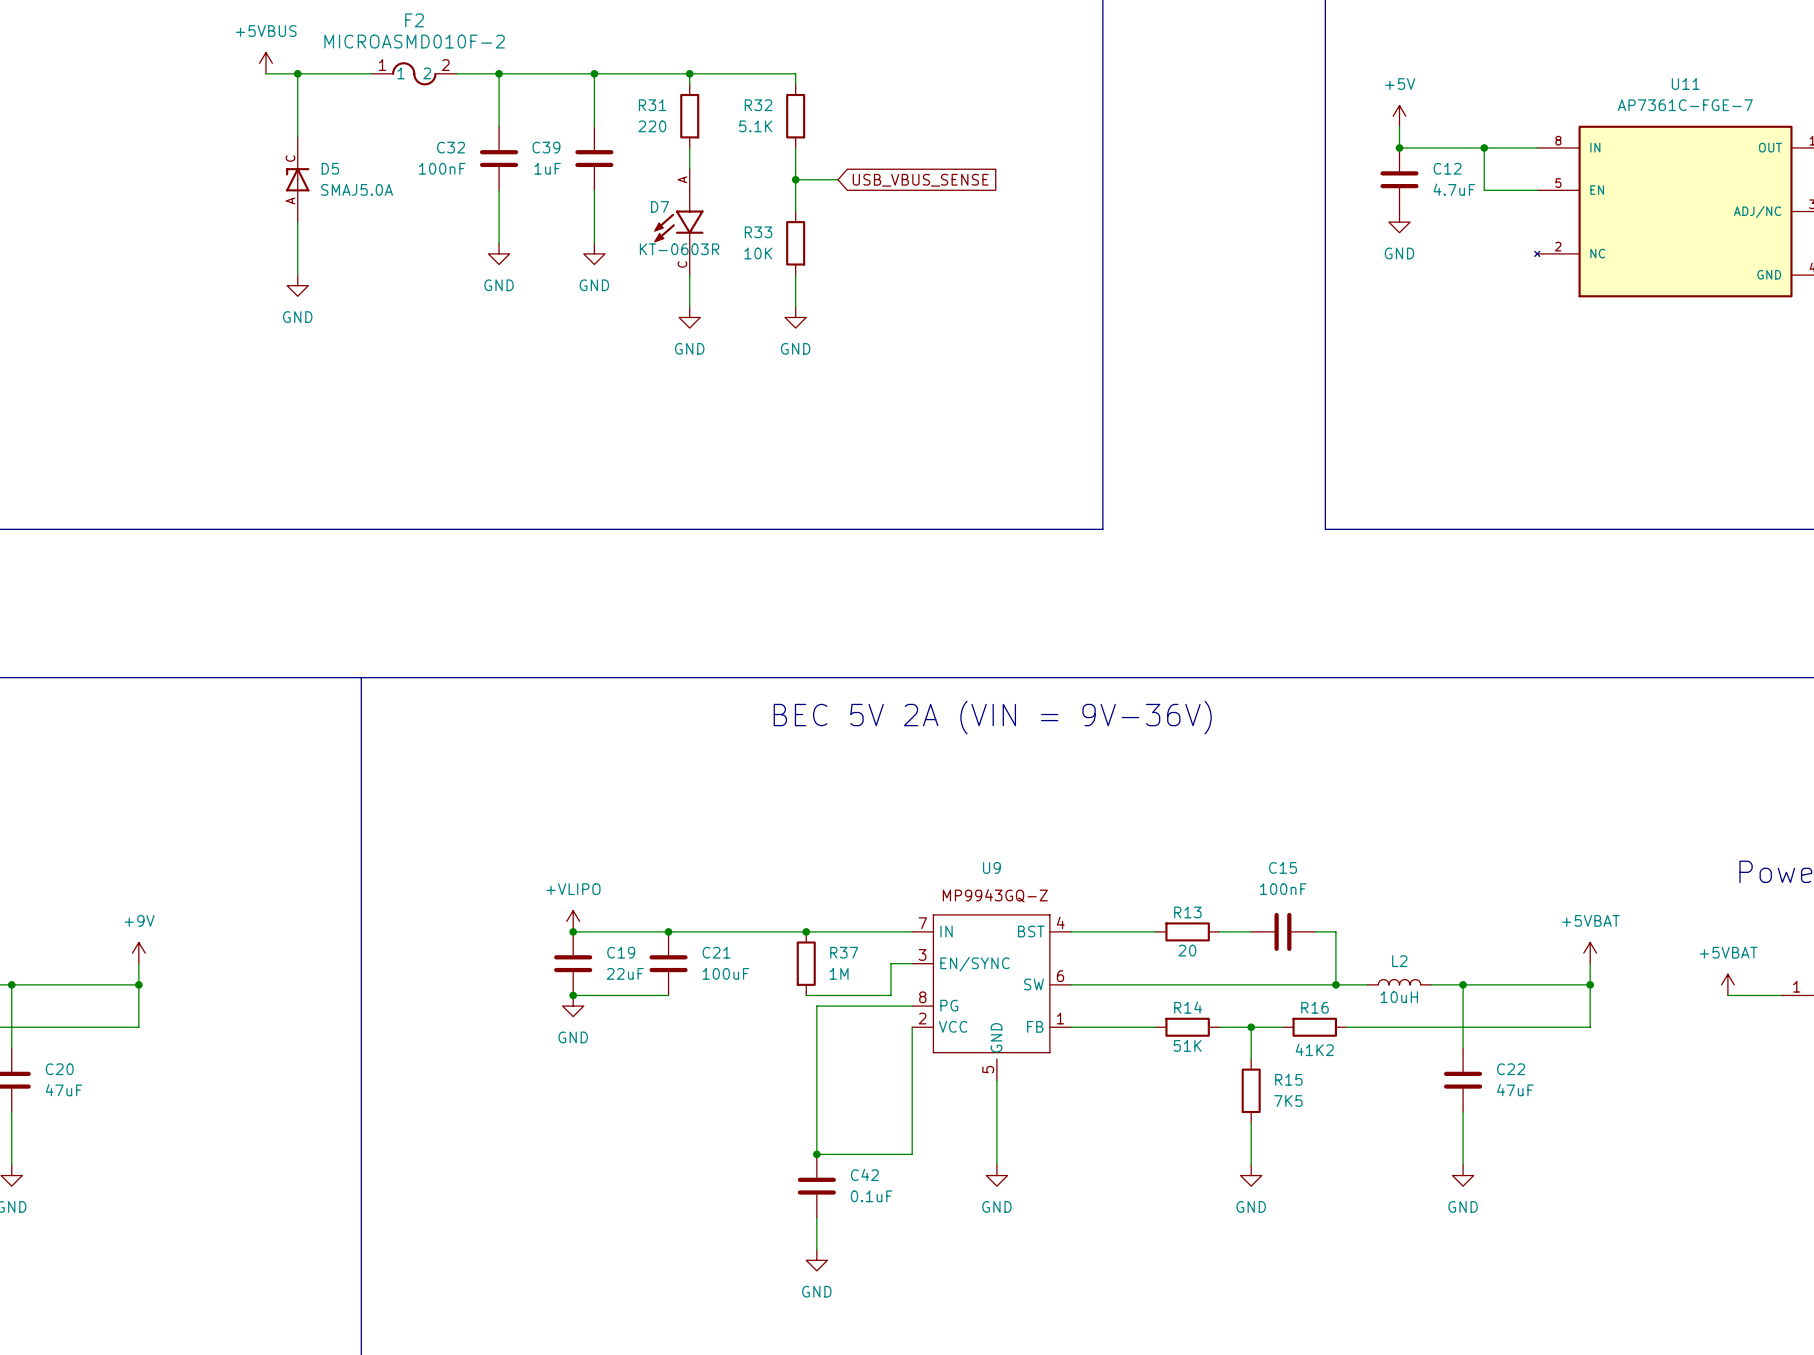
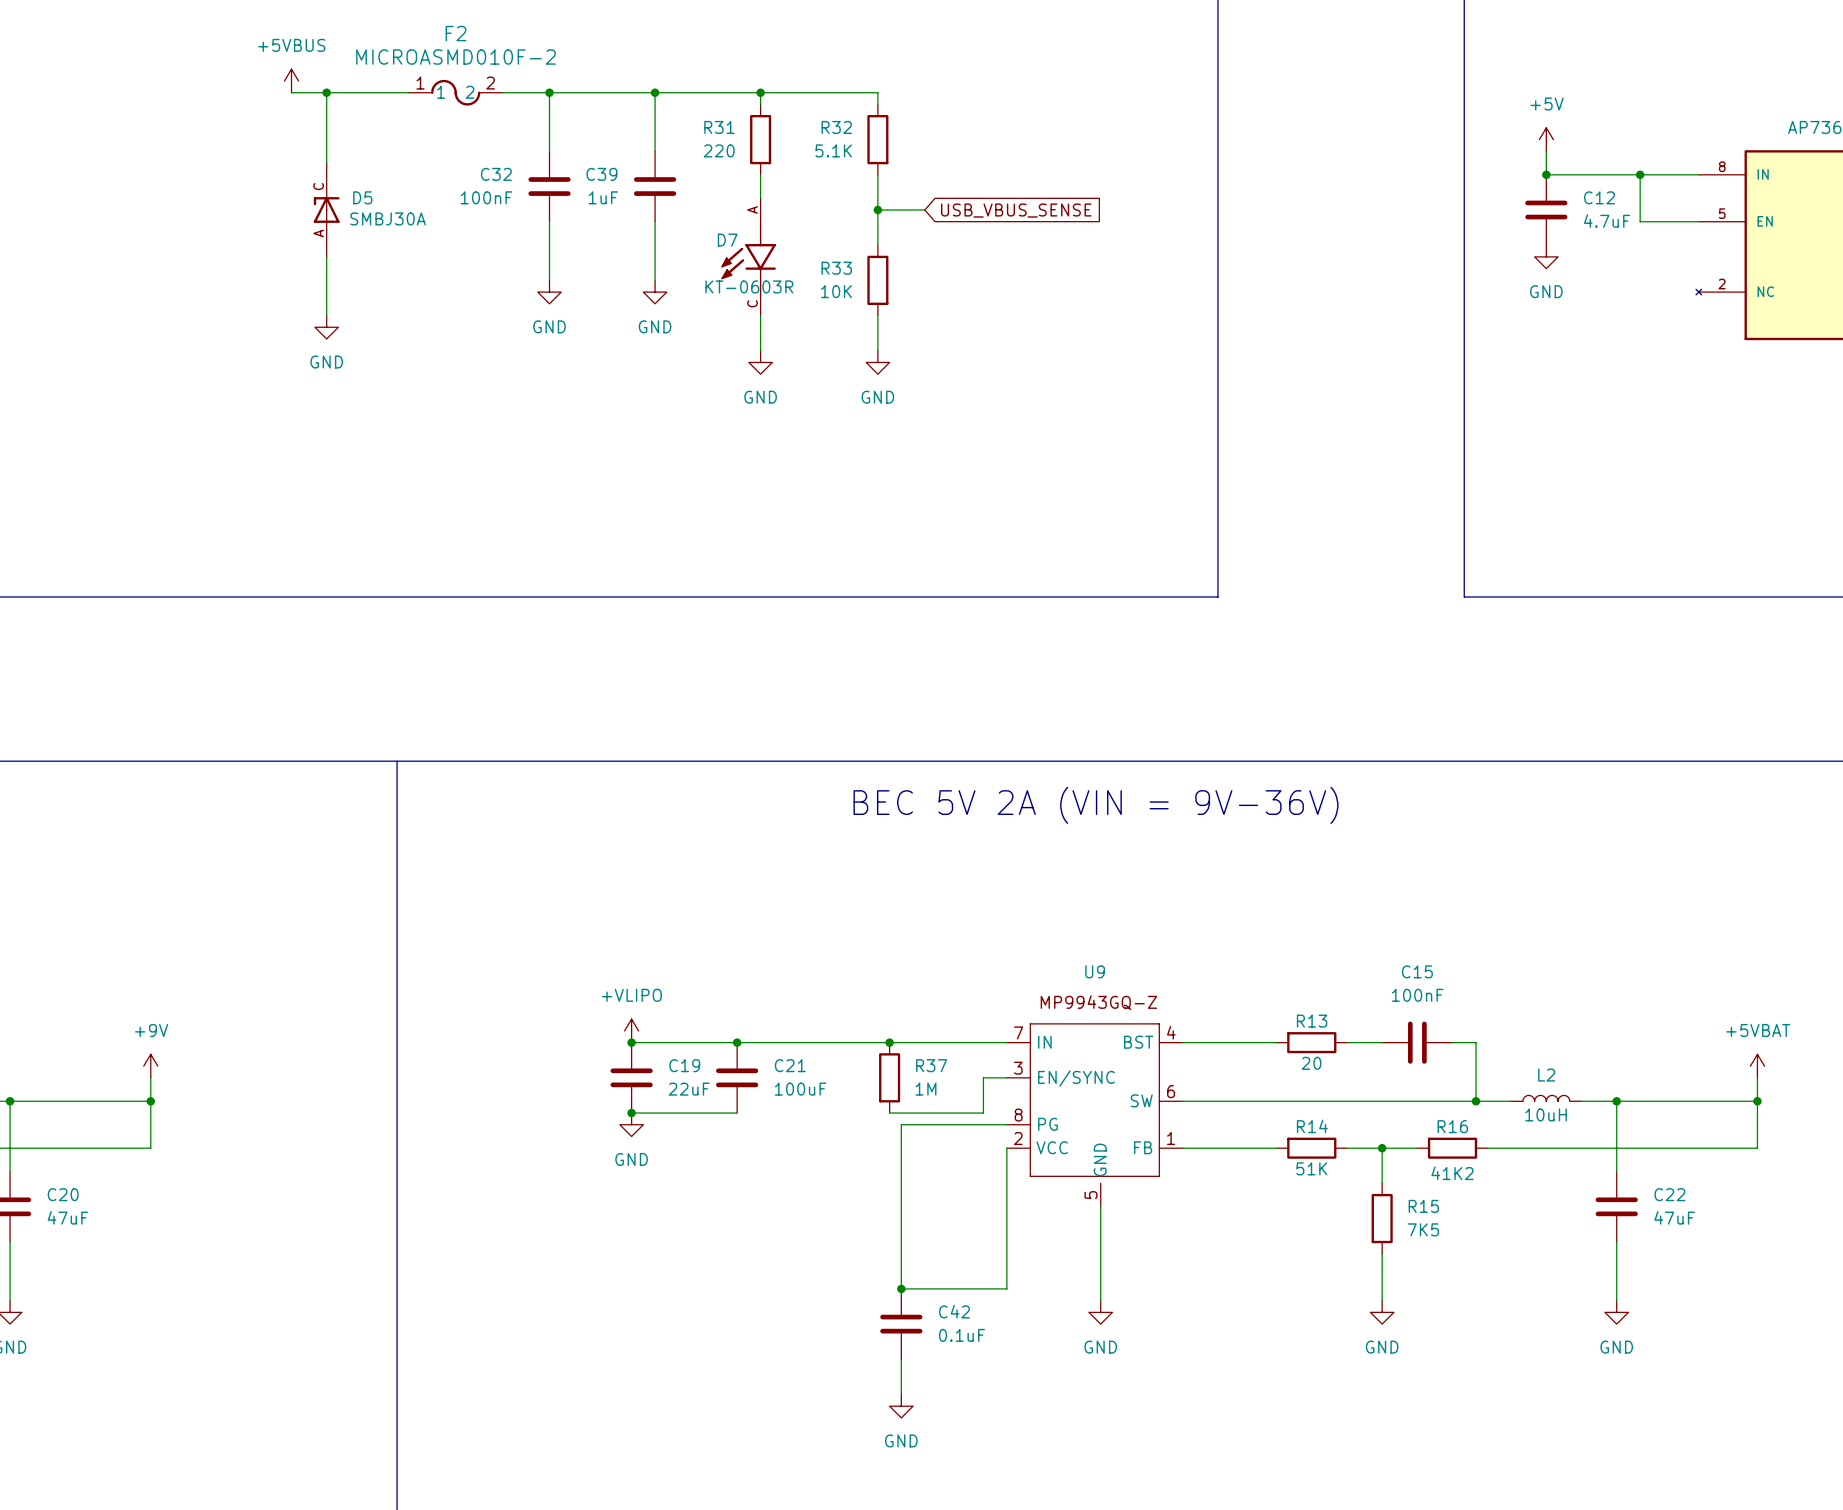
D5 value: SMAJ5.0A (357, 189) -> SMBJ30A (388, 218)

